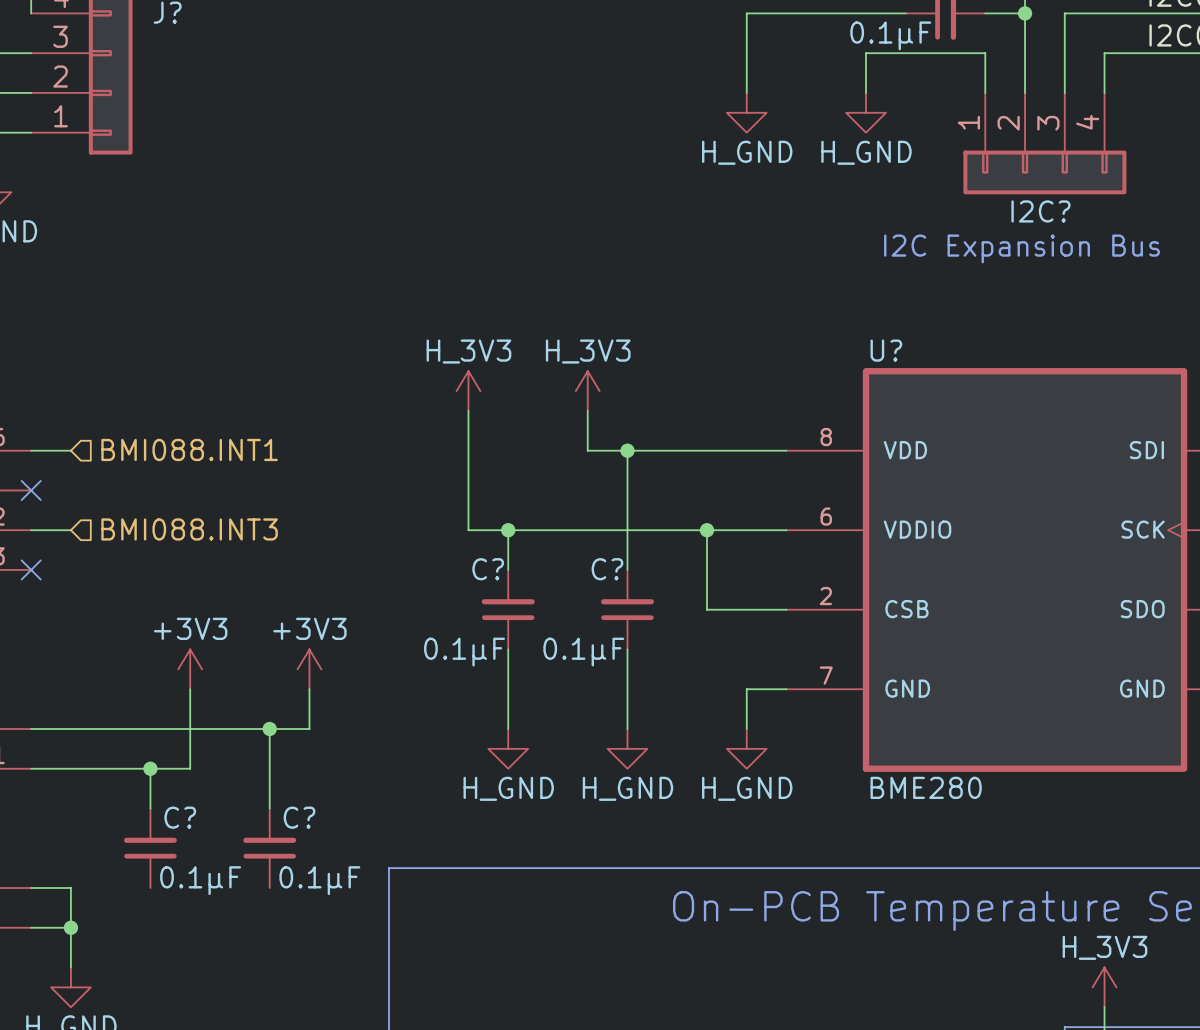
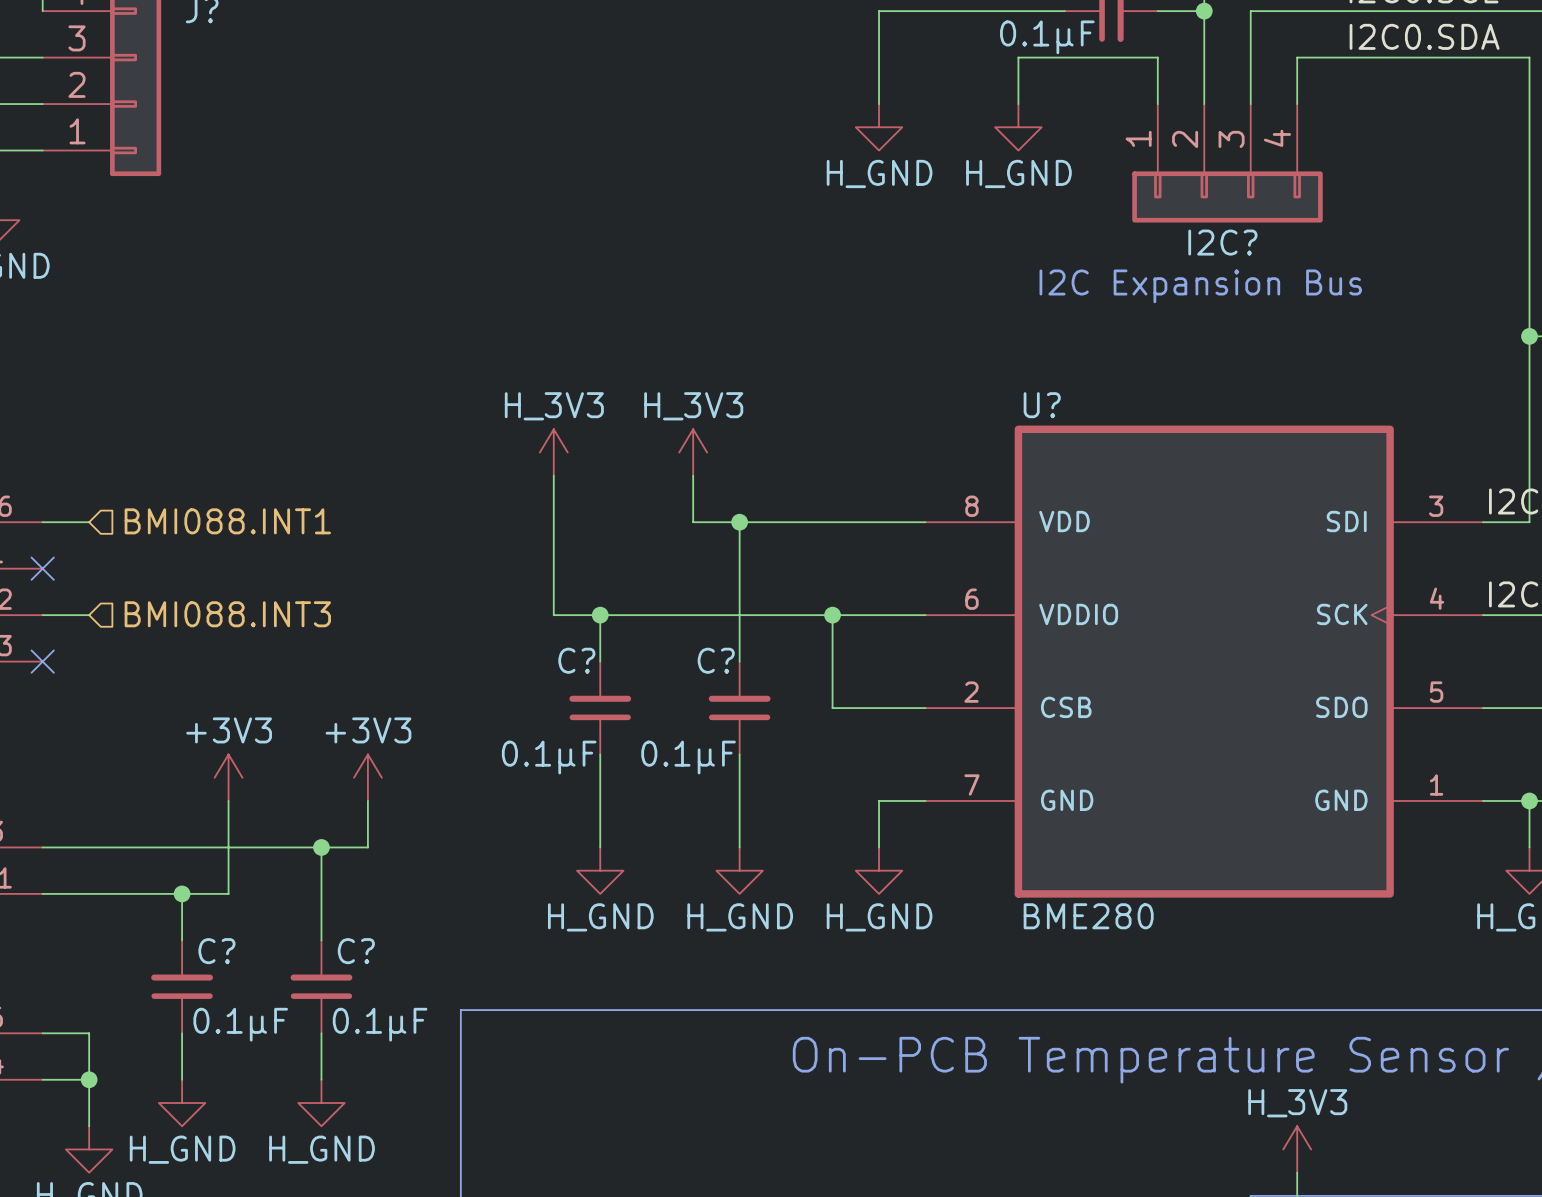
wire: none -> (182, 1033) (182, 1079)
wire: none -> (321, 1033) (321, 1079)
power symbol: none -> H_GND (182, 1103)
power symbol: none -> H_GND (321, 1103)

